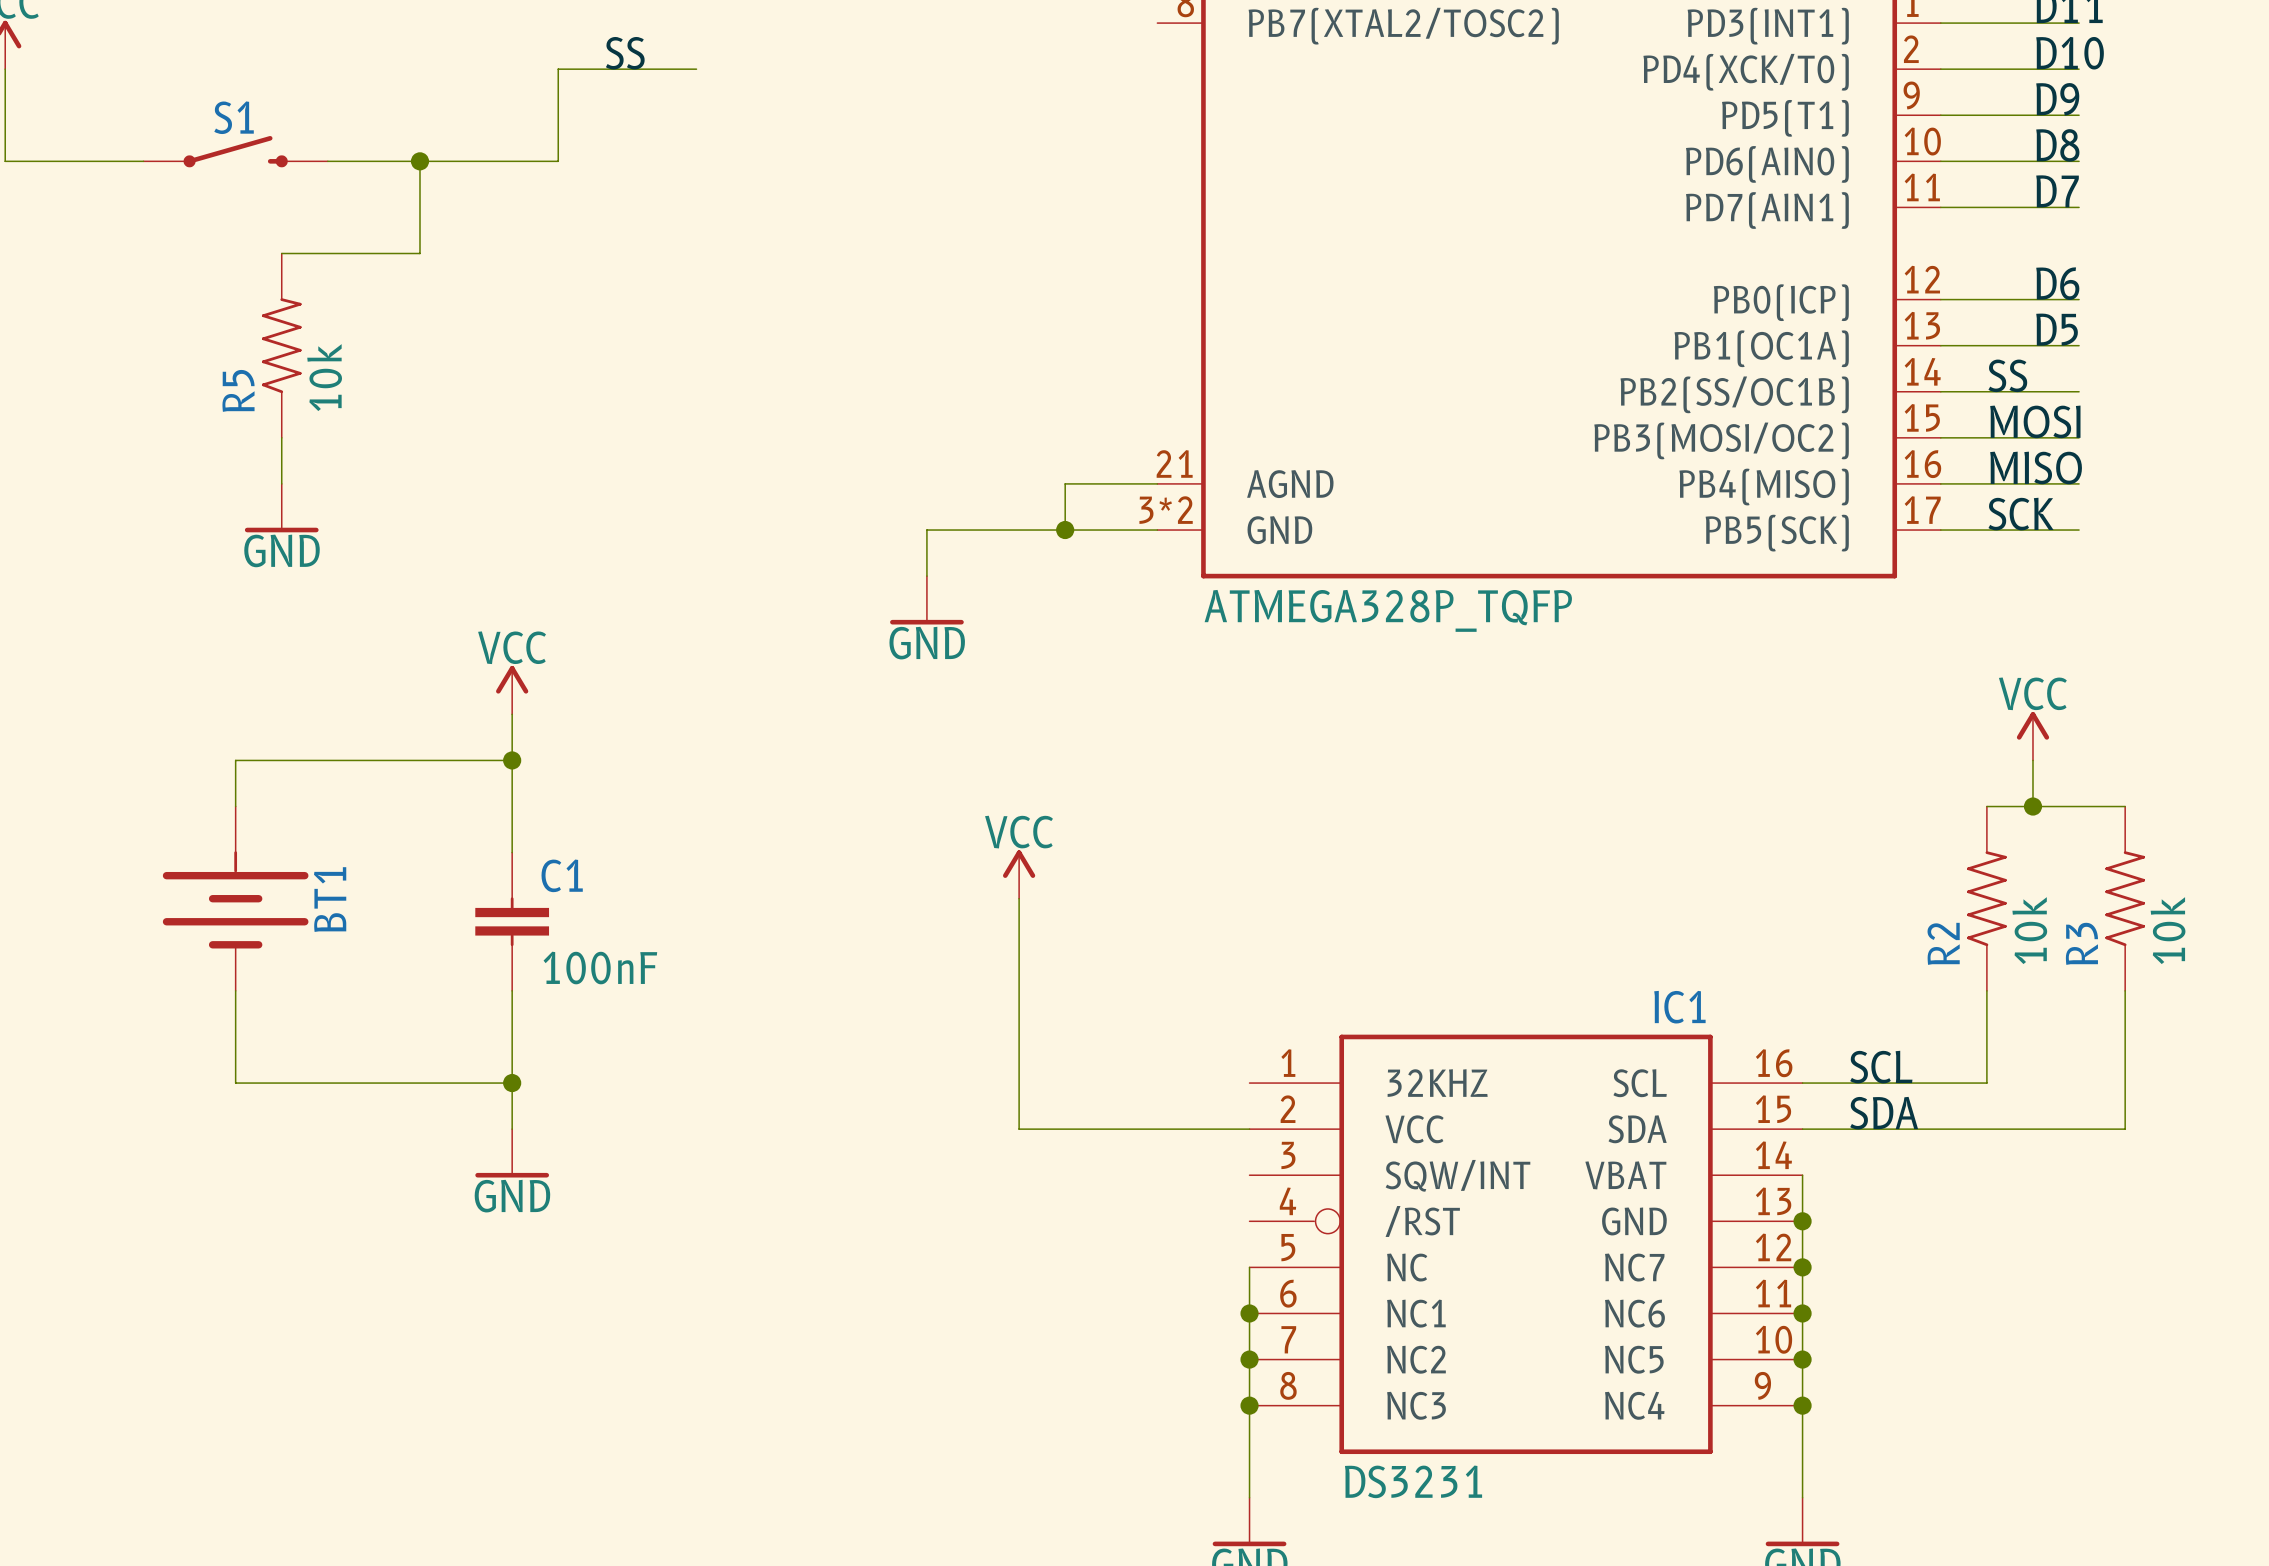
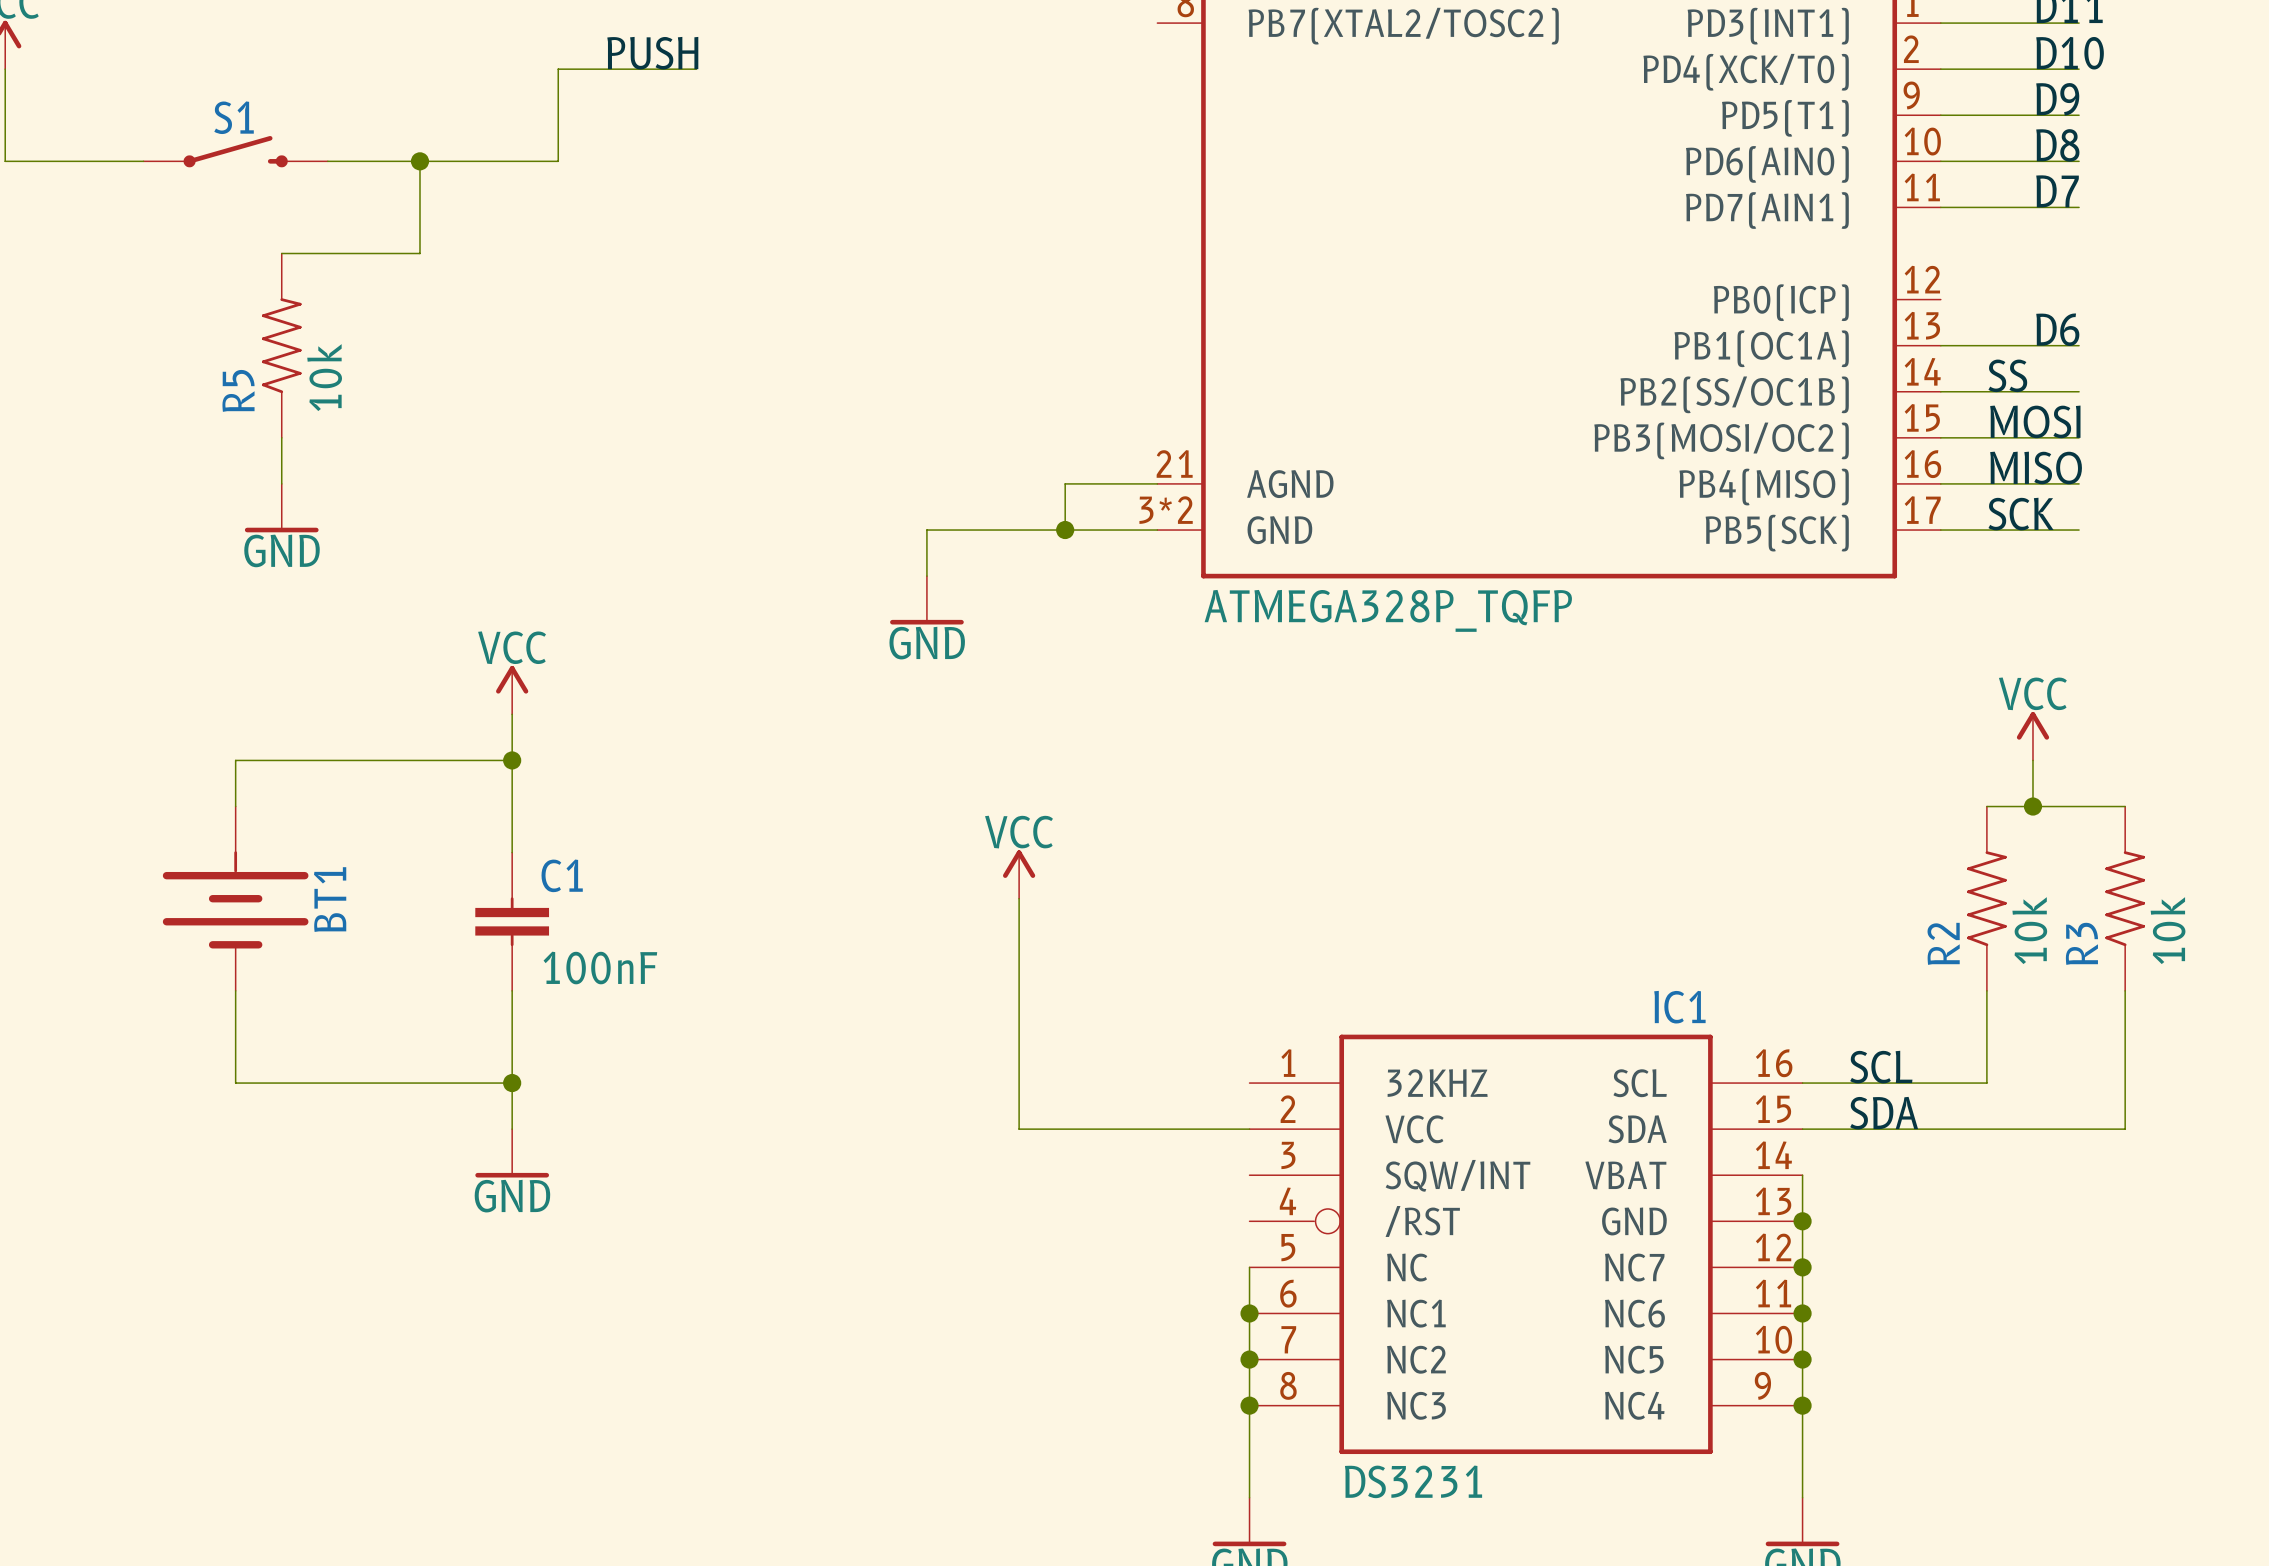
label: SS (625, 53) -> PUSH (652, 53)
label: D6 (2057, 283) -> none
wire: (1940, 299) (2079, 299) -> none
label: D5 (2057, 329) -> D6 (2057, 329)

